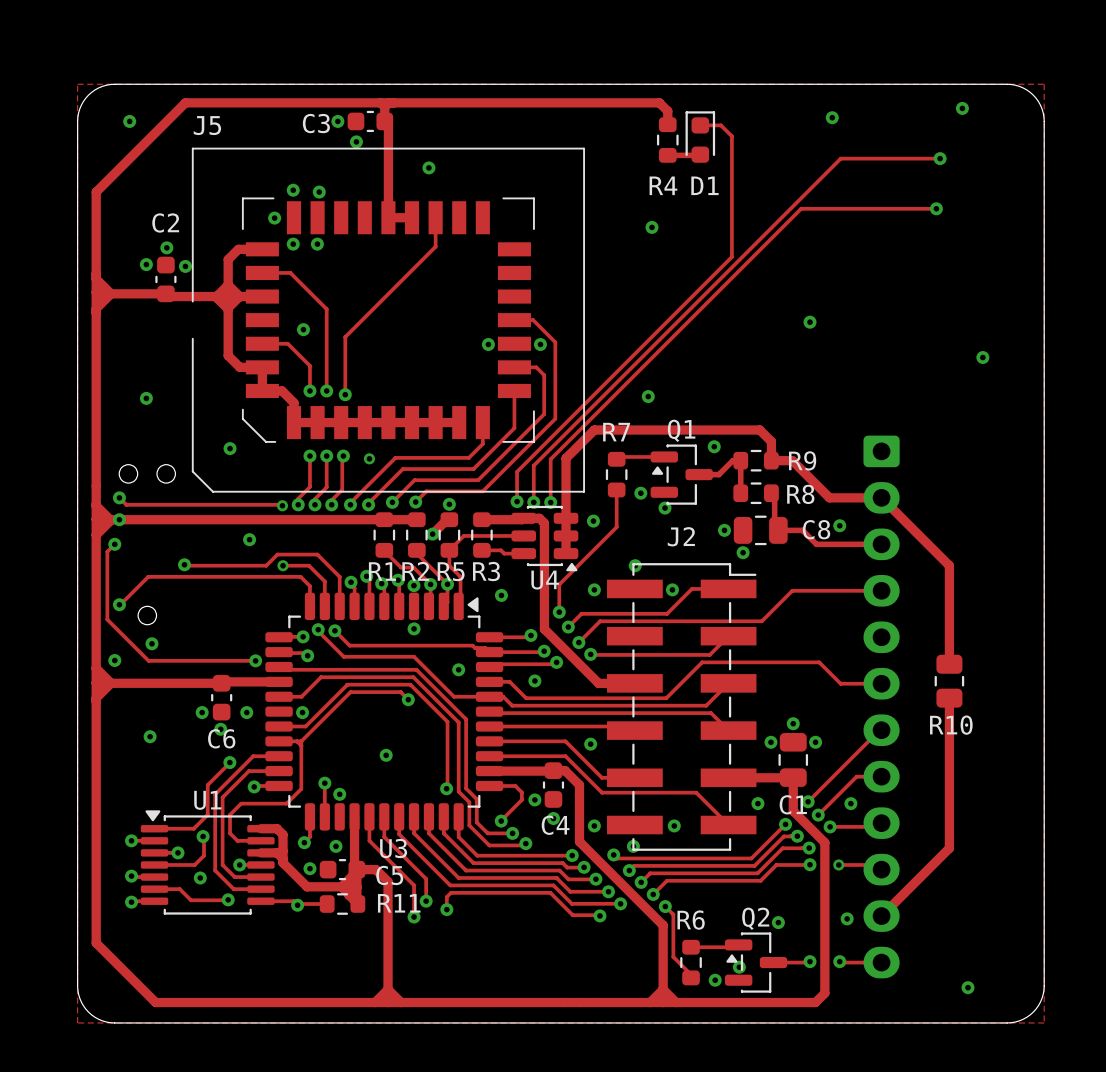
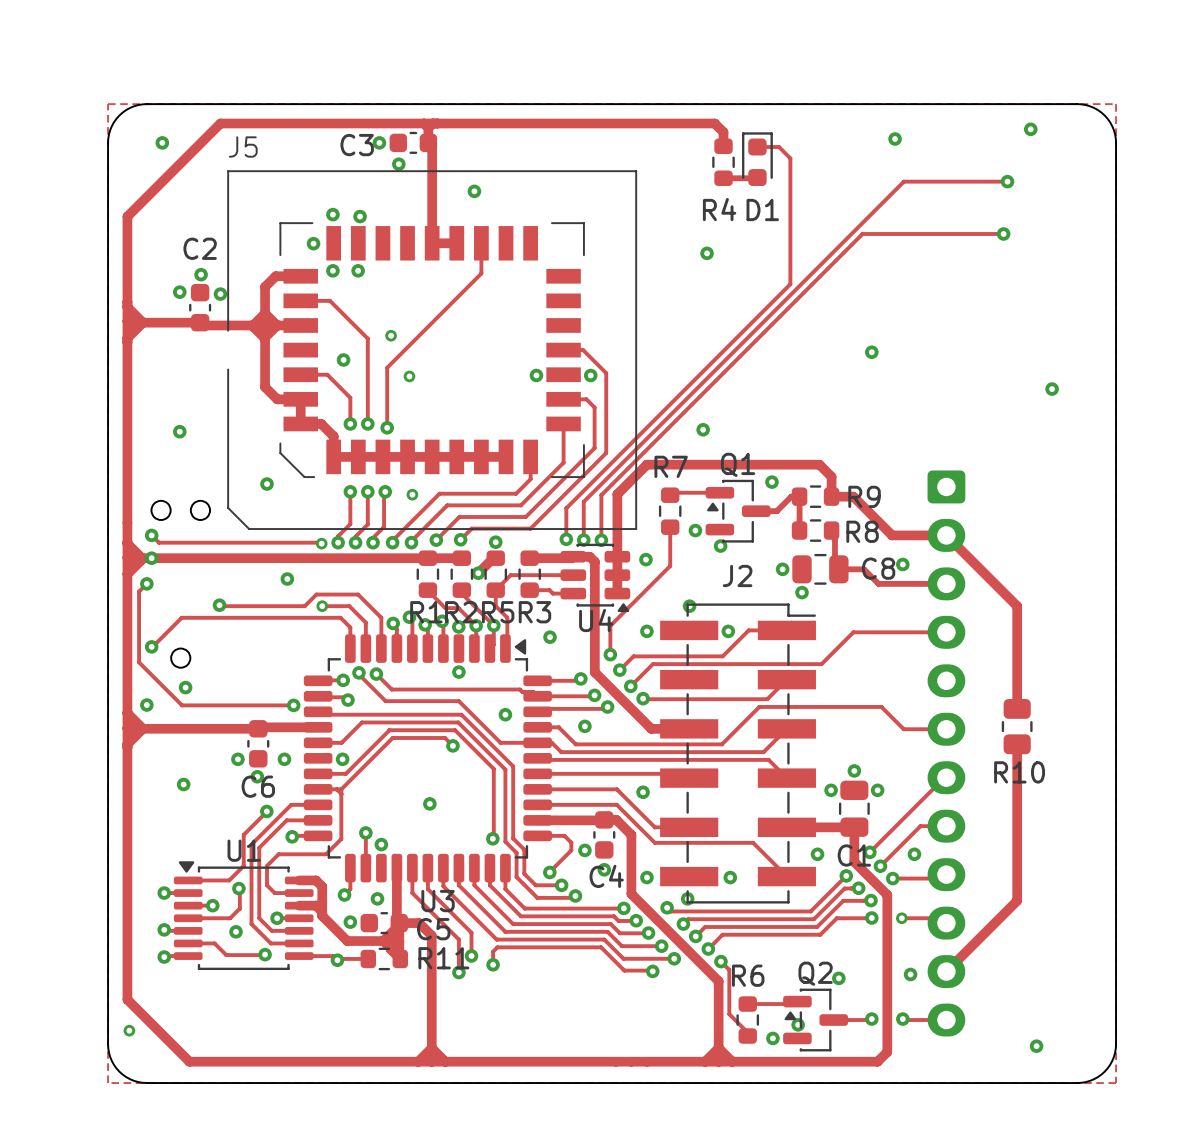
via: none -> (391, 335)
via: none -> (409, 376)
via: none -> (129, 1030)

